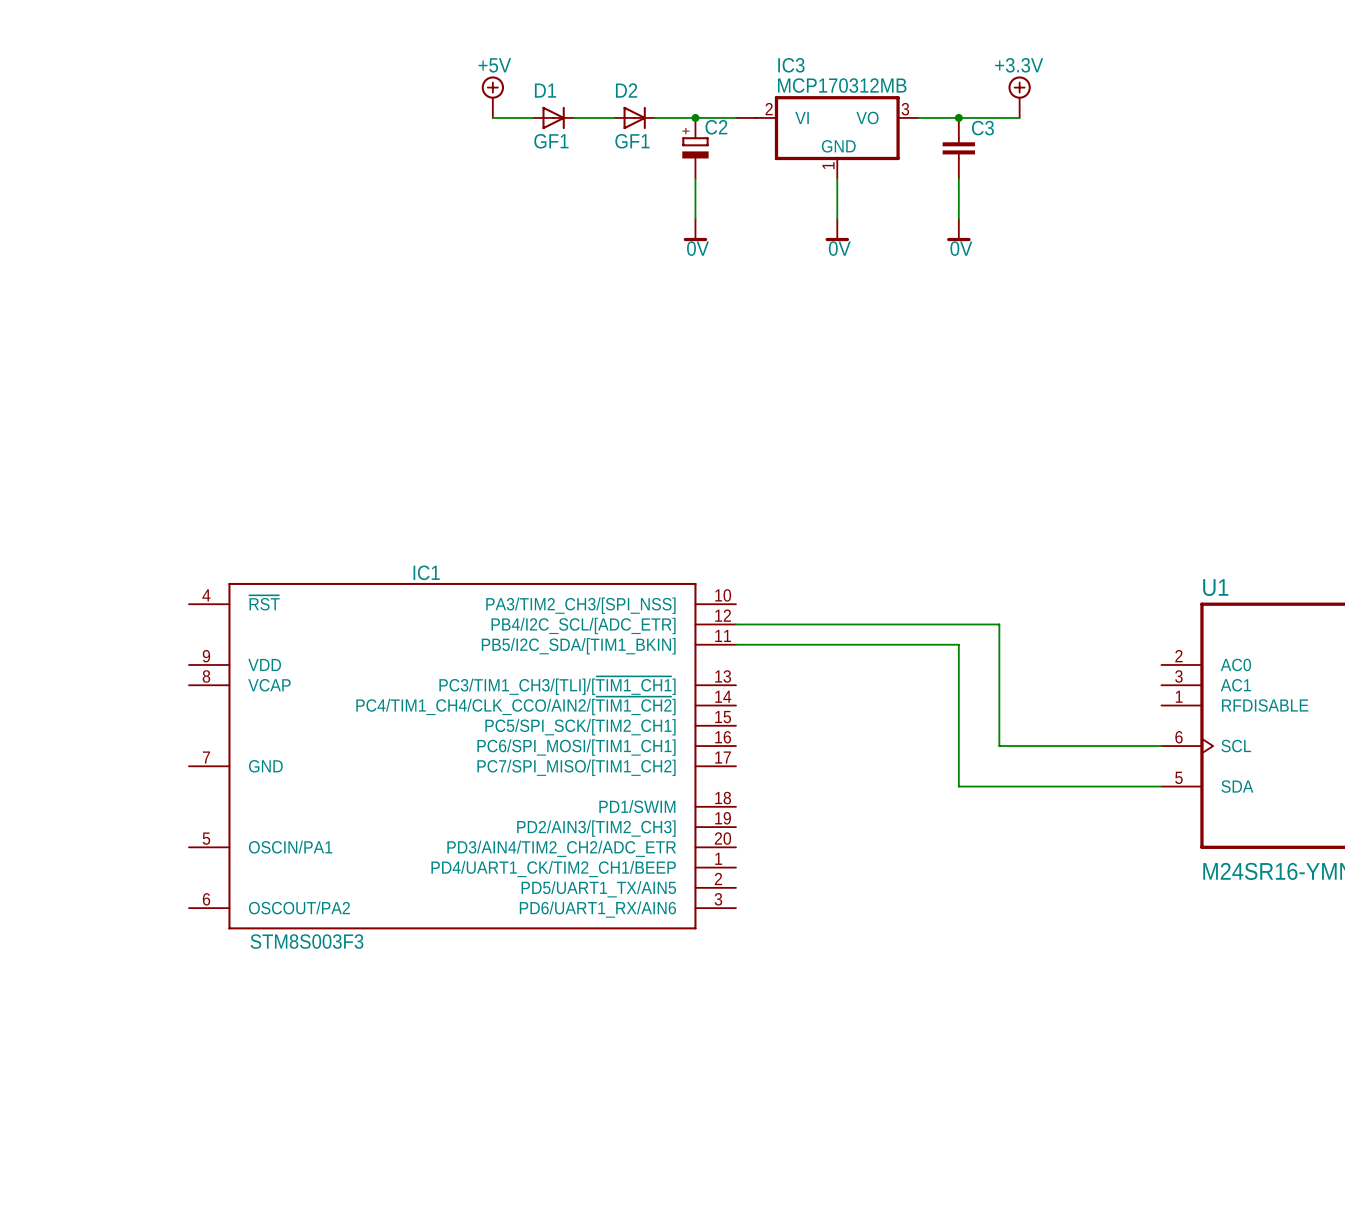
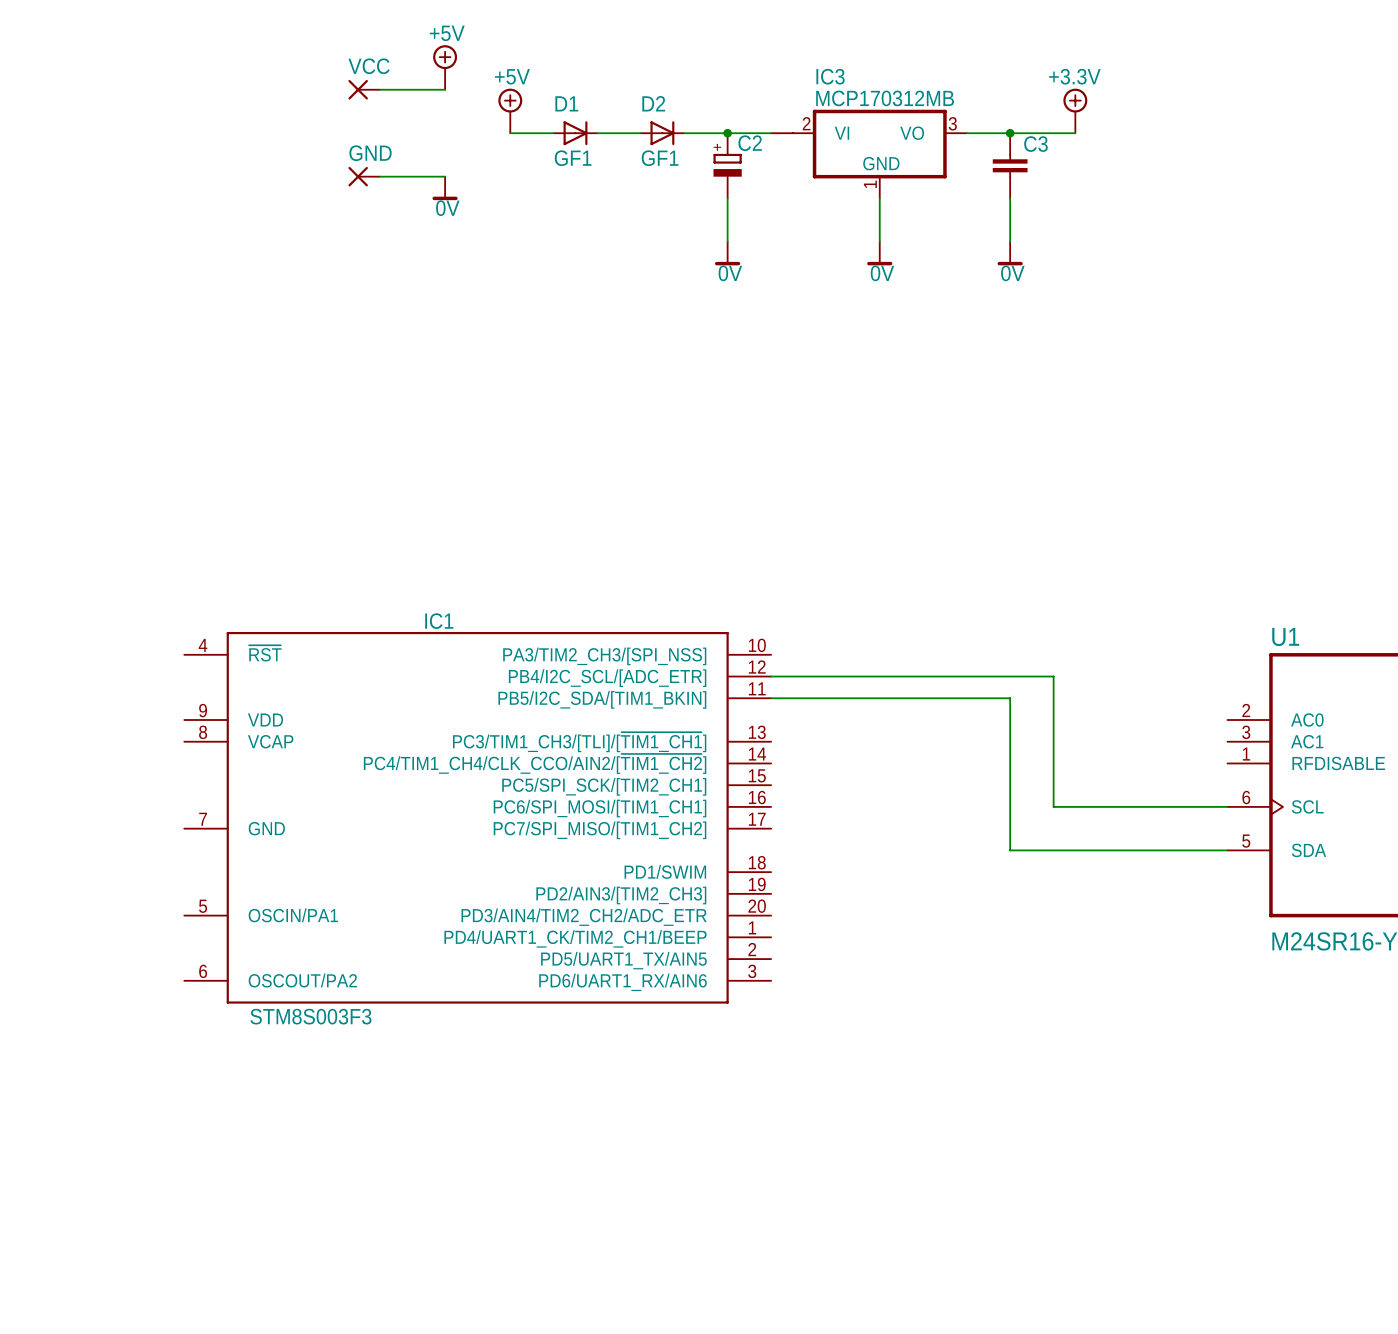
power symbol: none -> +5V (445, 67)
VCC: none -> (364, 89)
wire: none -> (379, 89) (445, 89)
GND: none -> (364, 176)
wire: none -> (379, 176) (445, 176)
power symbol: none -> 0V (445, 188)

